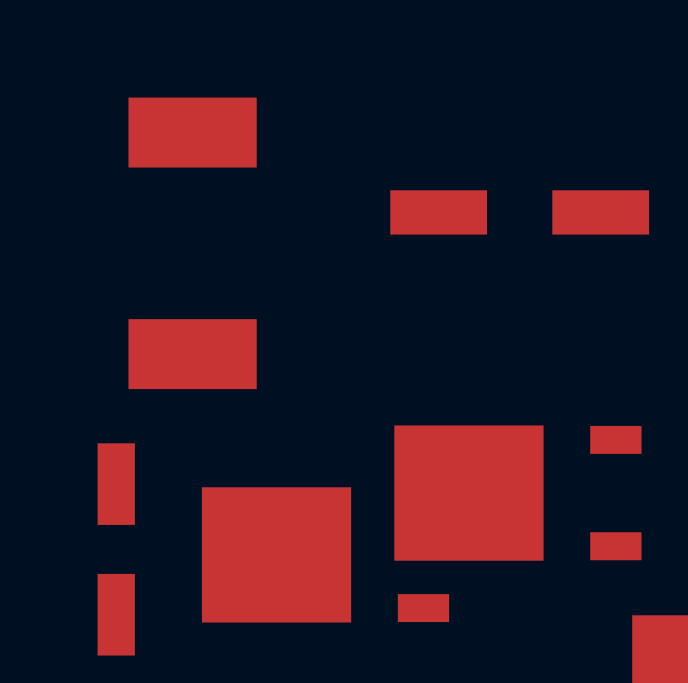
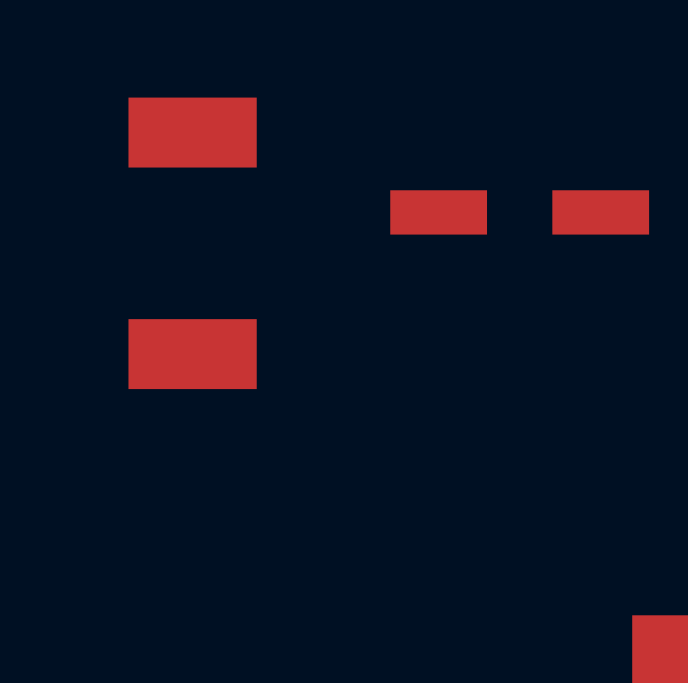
part: (517, 493) -> none
part: (116, 549) -> none
part: (325, 554) -> none

